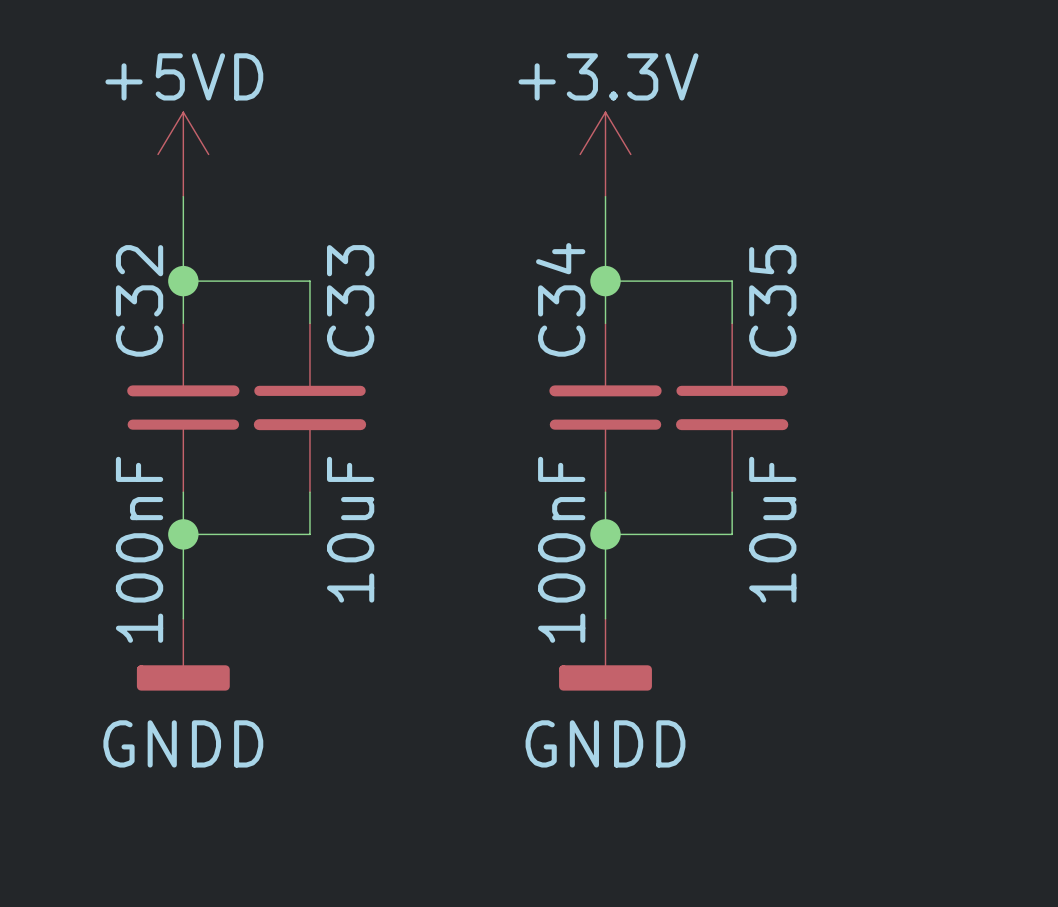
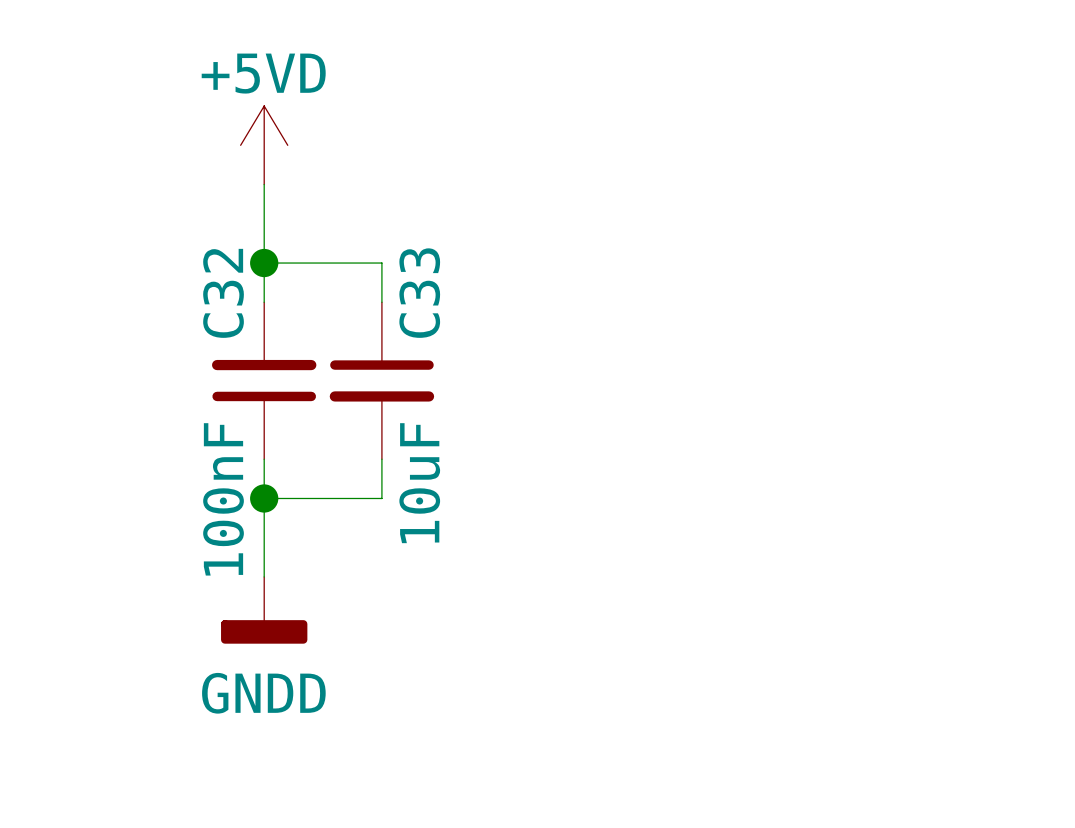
power symbol: +3.3V (605, 154) -> none
wire: (605, 196) (605, 323) -> none
wire: (605, 281) (732, 281) (732, 323) -> none
junction: (605, 281) -> none
C34: 100nF (605, 407) -> none
C35: 10uF (732, 407) -> none
wire: (605, 492) (605, 618) -> none
wire: (732, 492) (732, 534) (605, 534) -> none
junction: (605, 534) -> none
power symbol: GNDD (605, 654) -> none

